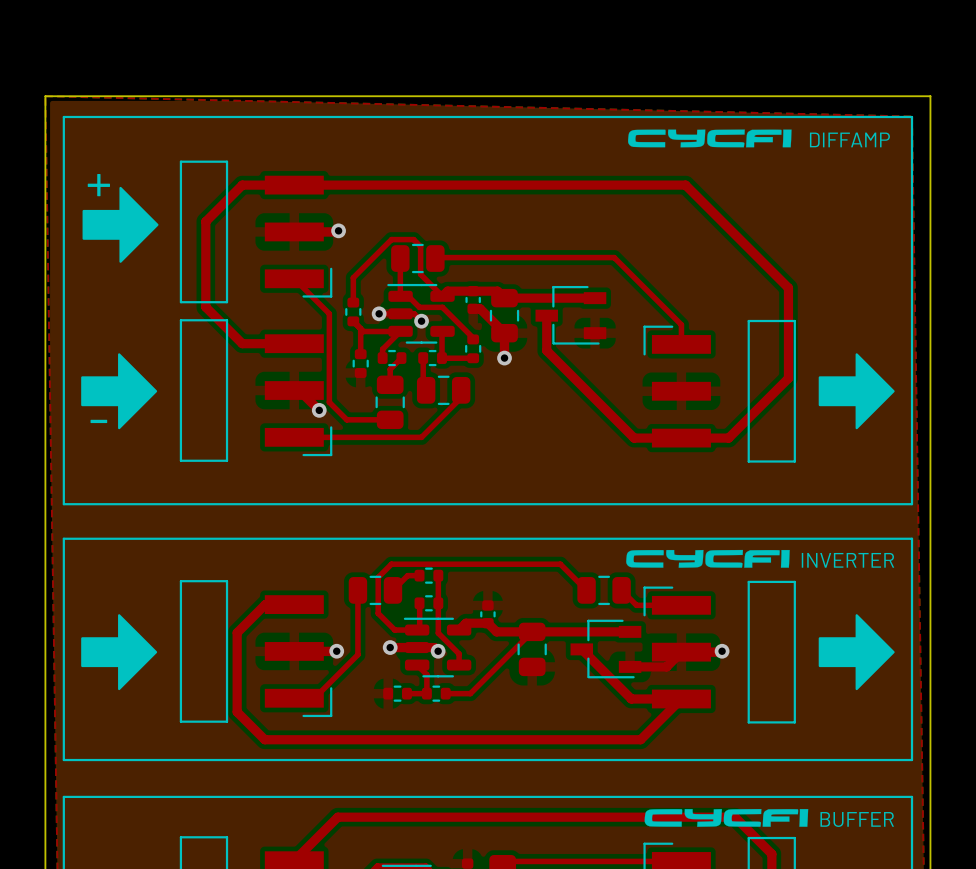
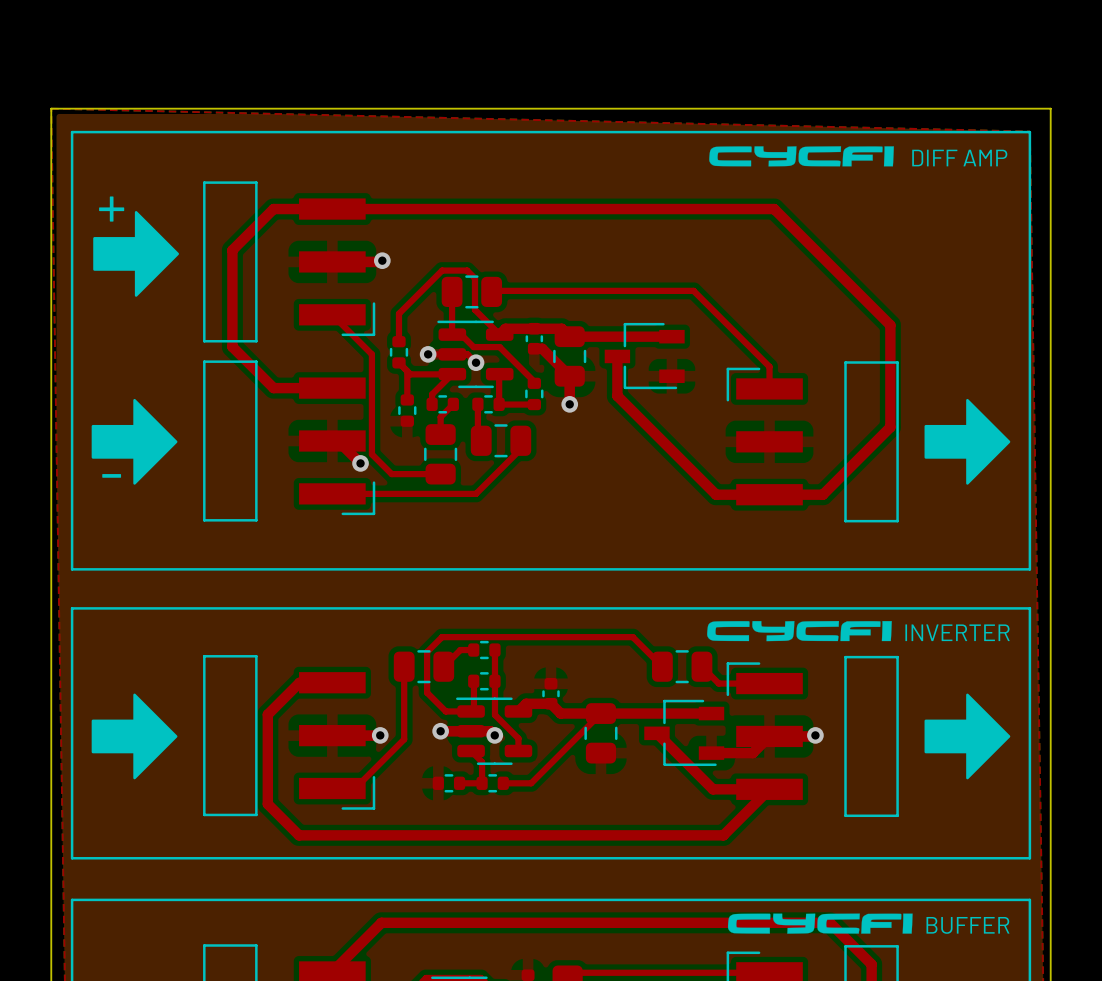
text: DIFFAMP (849, 139) -> DIFF AMP (959, 158)

